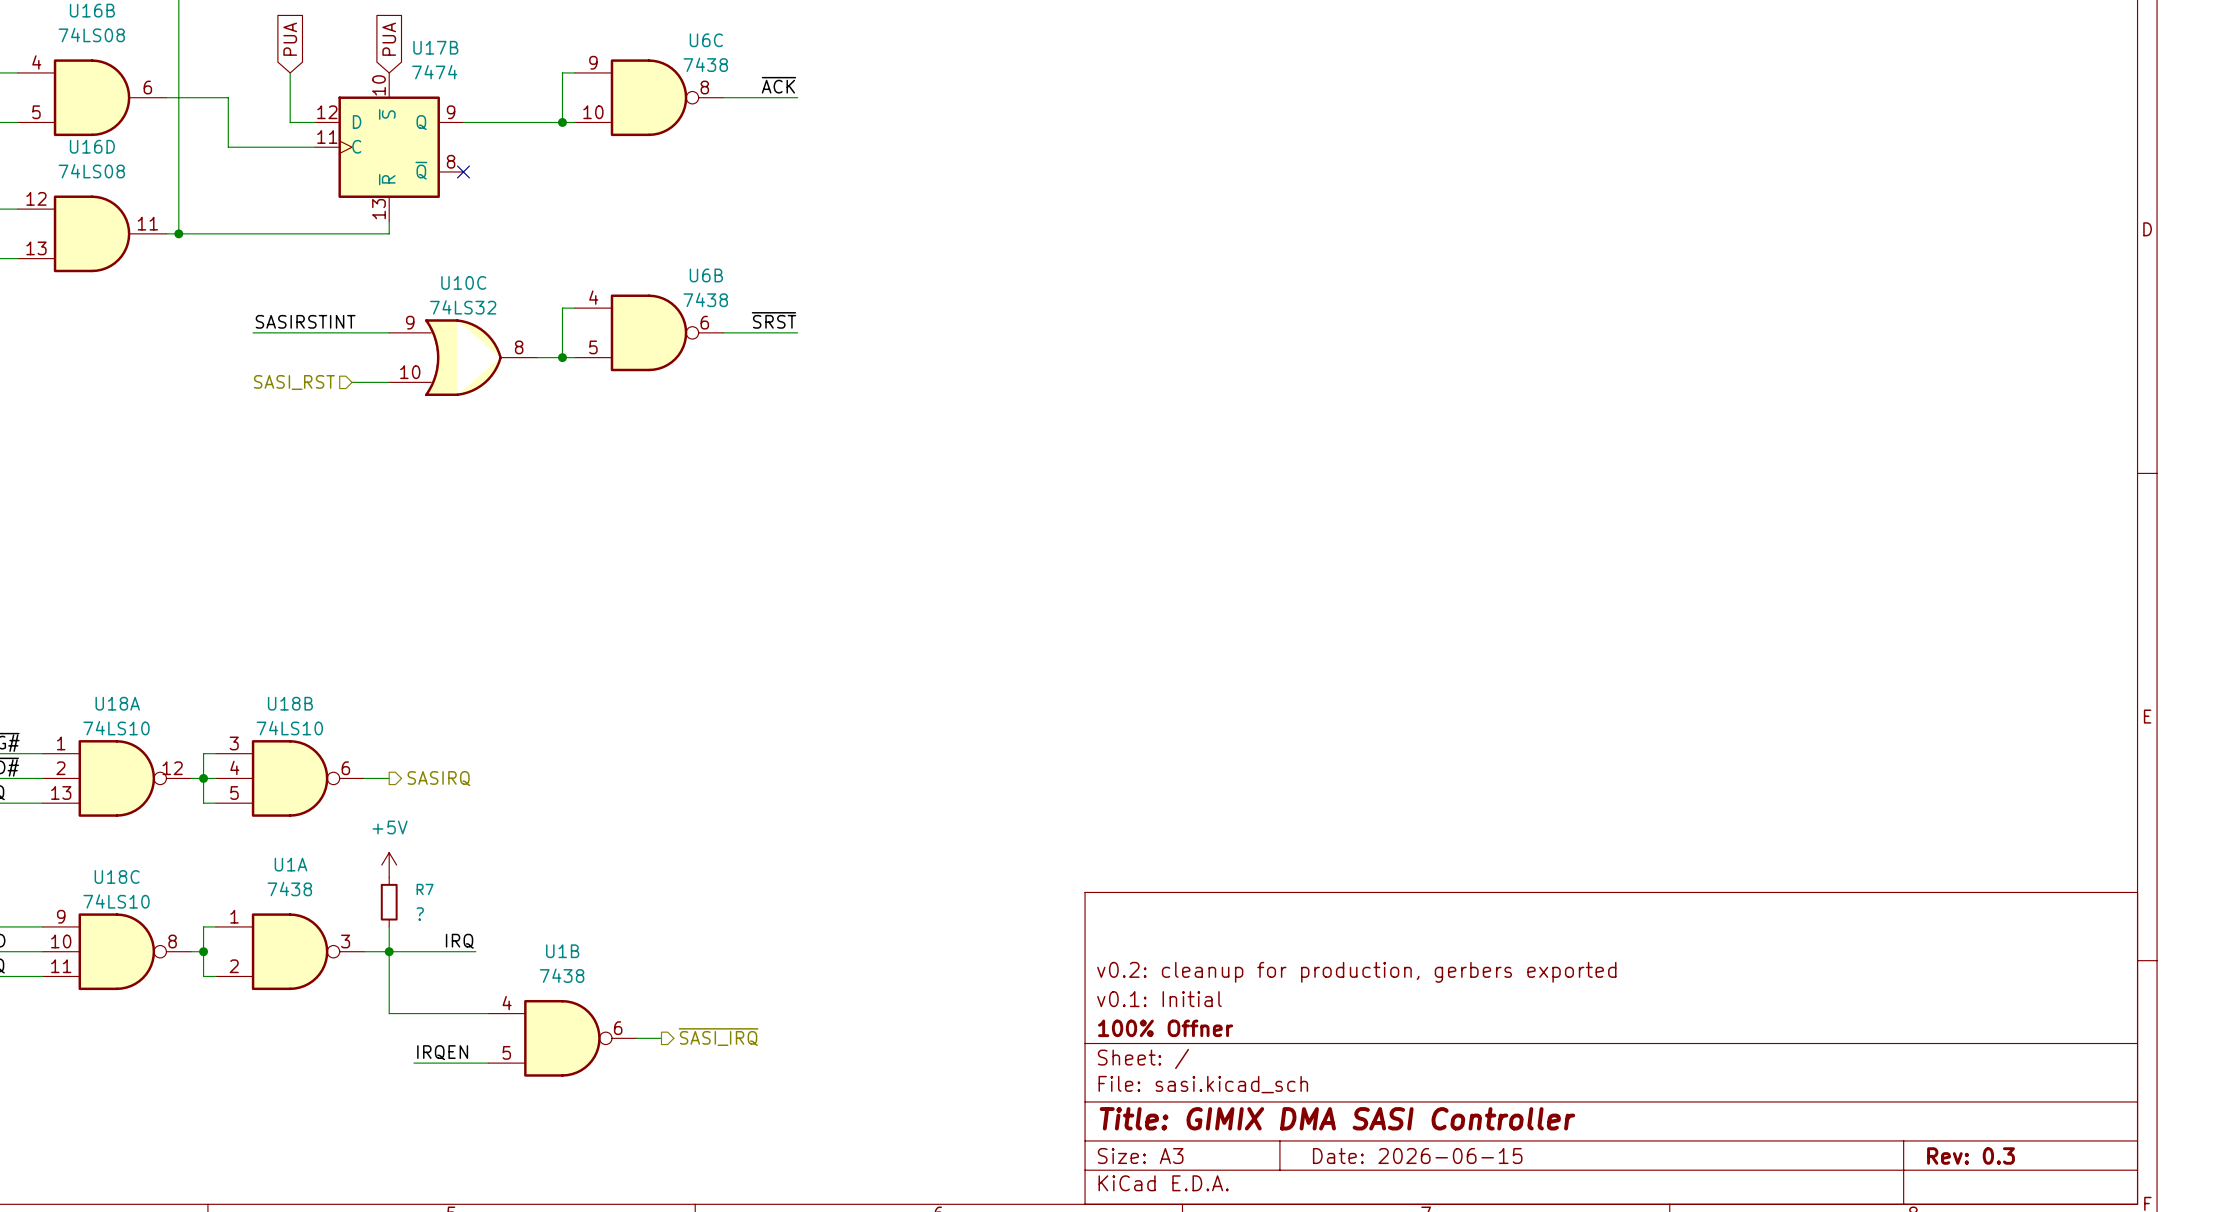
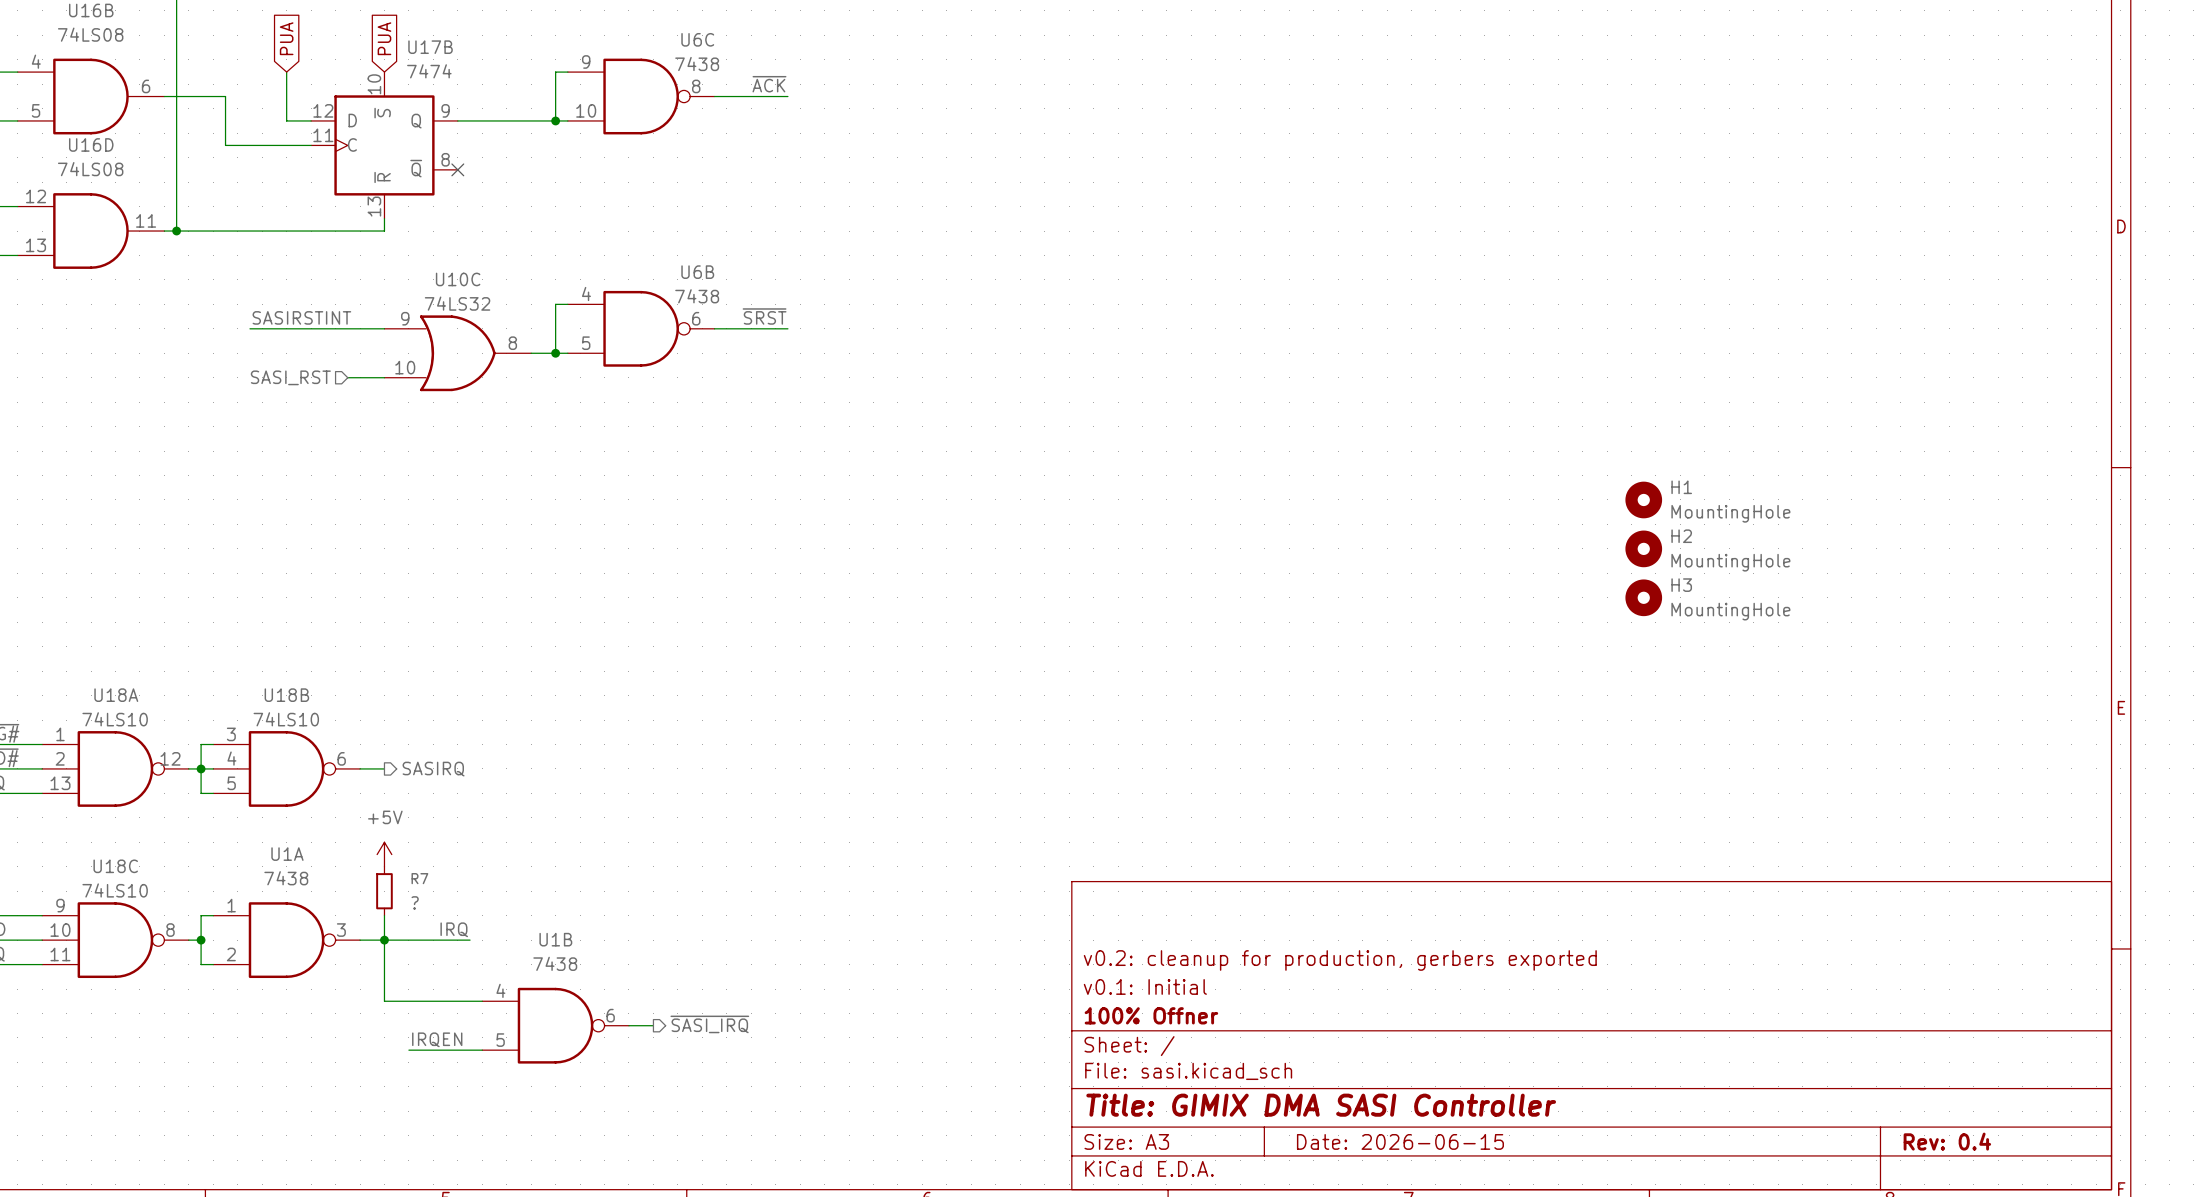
H1: none -> MountingHole (1643, 499)
H2: none -> MountingHole (1643, 548)
H3: none -> MountingHole (1643, 597)
title block: Rev: 0.3 (1971, 1156) -> Rev: 0.4 (1947, 1141)

